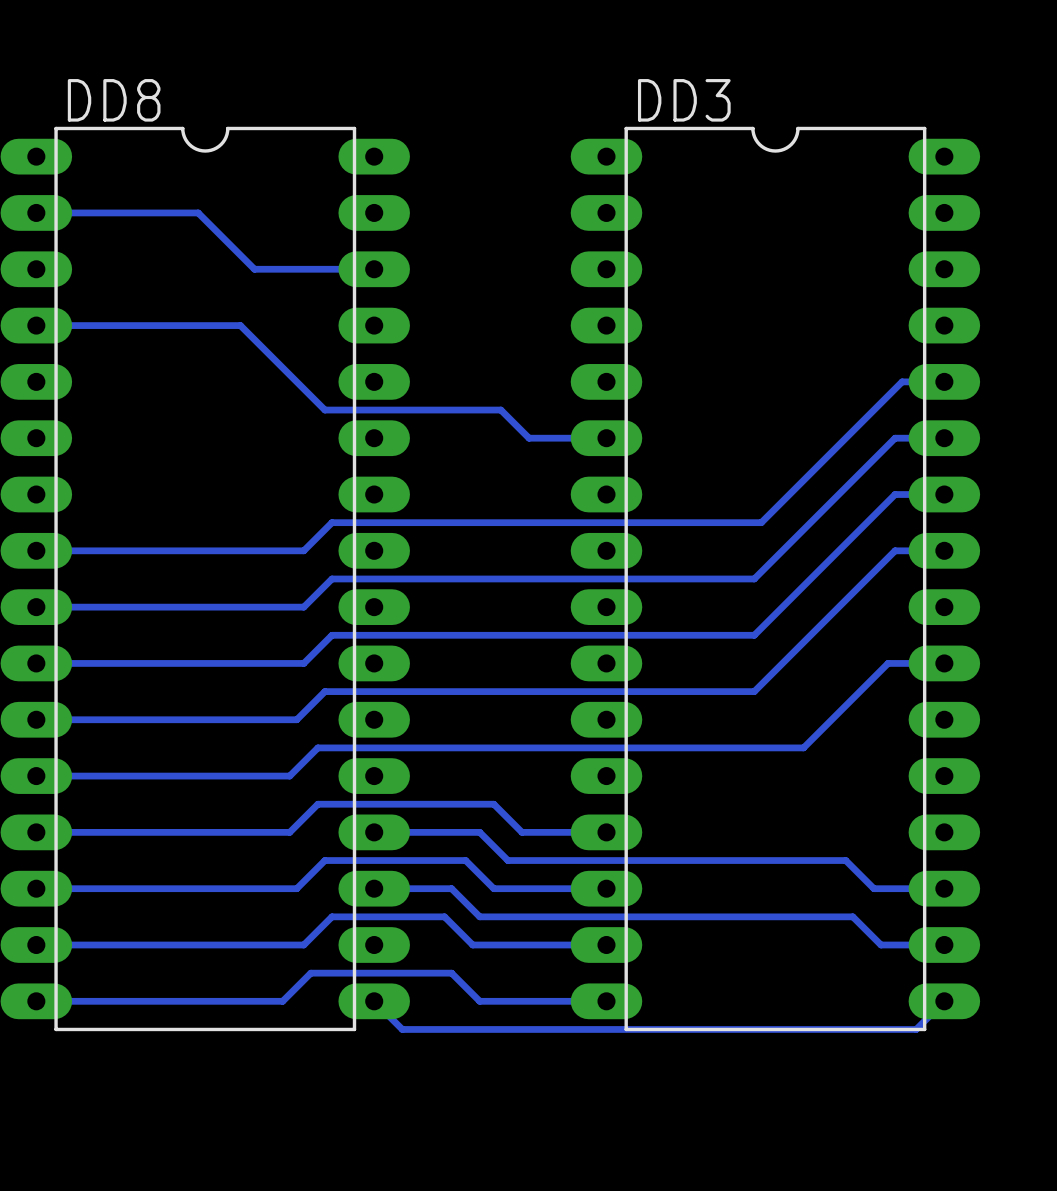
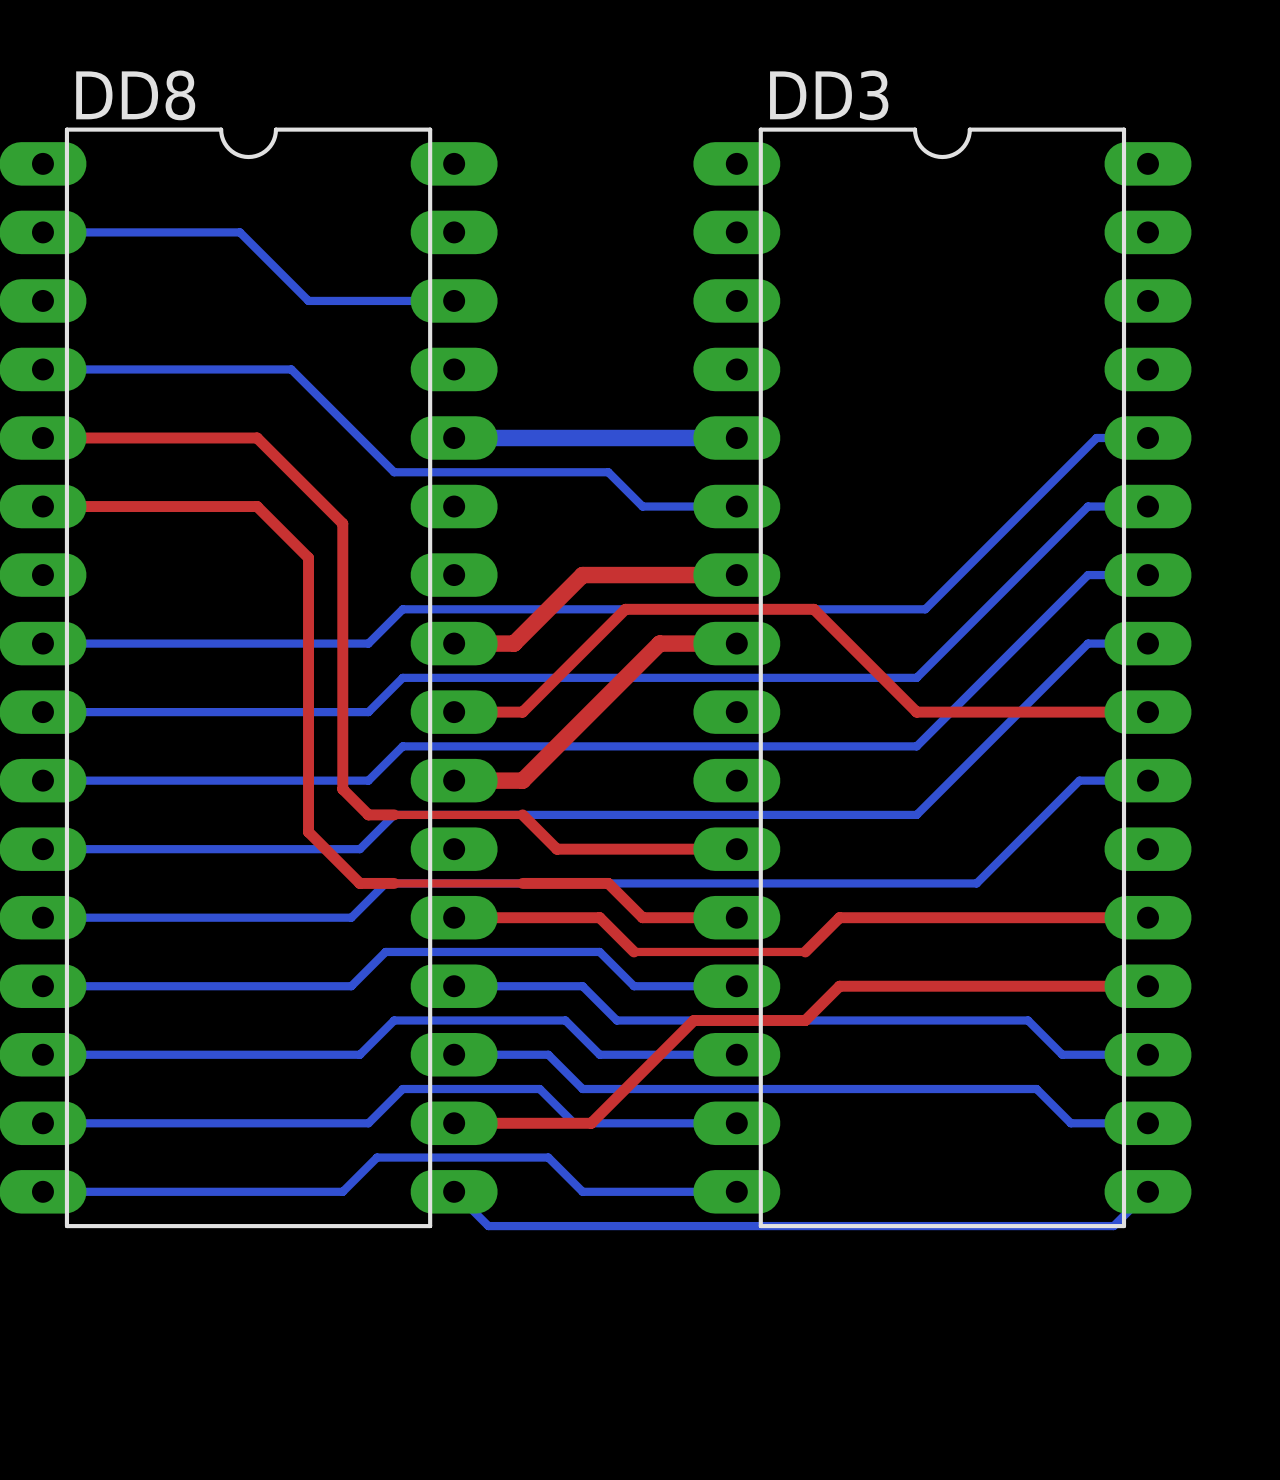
top track: none -> (42, 438) (257, 438) (342, 523) (342, 789) (368, 814) (522, 814) (556, 849) (736, 849)
bottom track: none -> (454, 438) (736, 438)
top track: none -> (42, 506) (257, 506) (308, 557) (308, 832) (359, 883) (608, 883) (642, 917) (736, 917)
top track: none -> (736, 575) (582, 575) (514, 643) (454, 643)
top track: none -> (736, 643) (659, 643) (522, 780) (454, 780)
top track: none -> (454, 712) (522, 712) (625, 609) (813, 609) (916, 712) (1147, 712)
top track: none -> (454, 917) (599, 917) (634, 951) (805, 951) (839, 917) (1147, 917)
top track: none -> (1147, 986) (839, 986) (805, 1020) (693, 1020) (591, 1123) (454, 1123)

